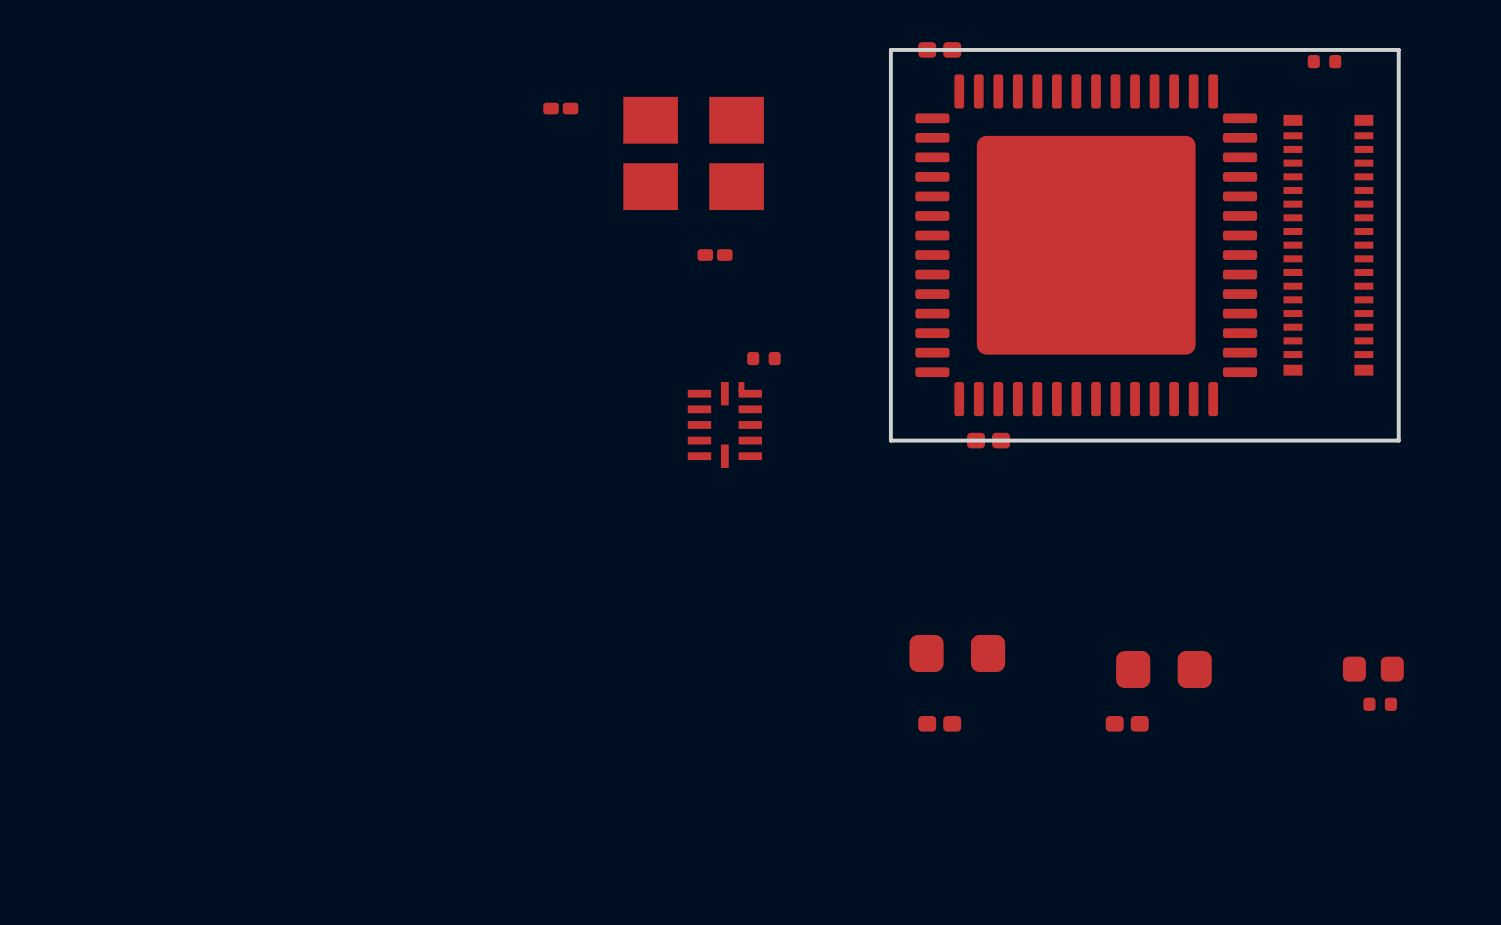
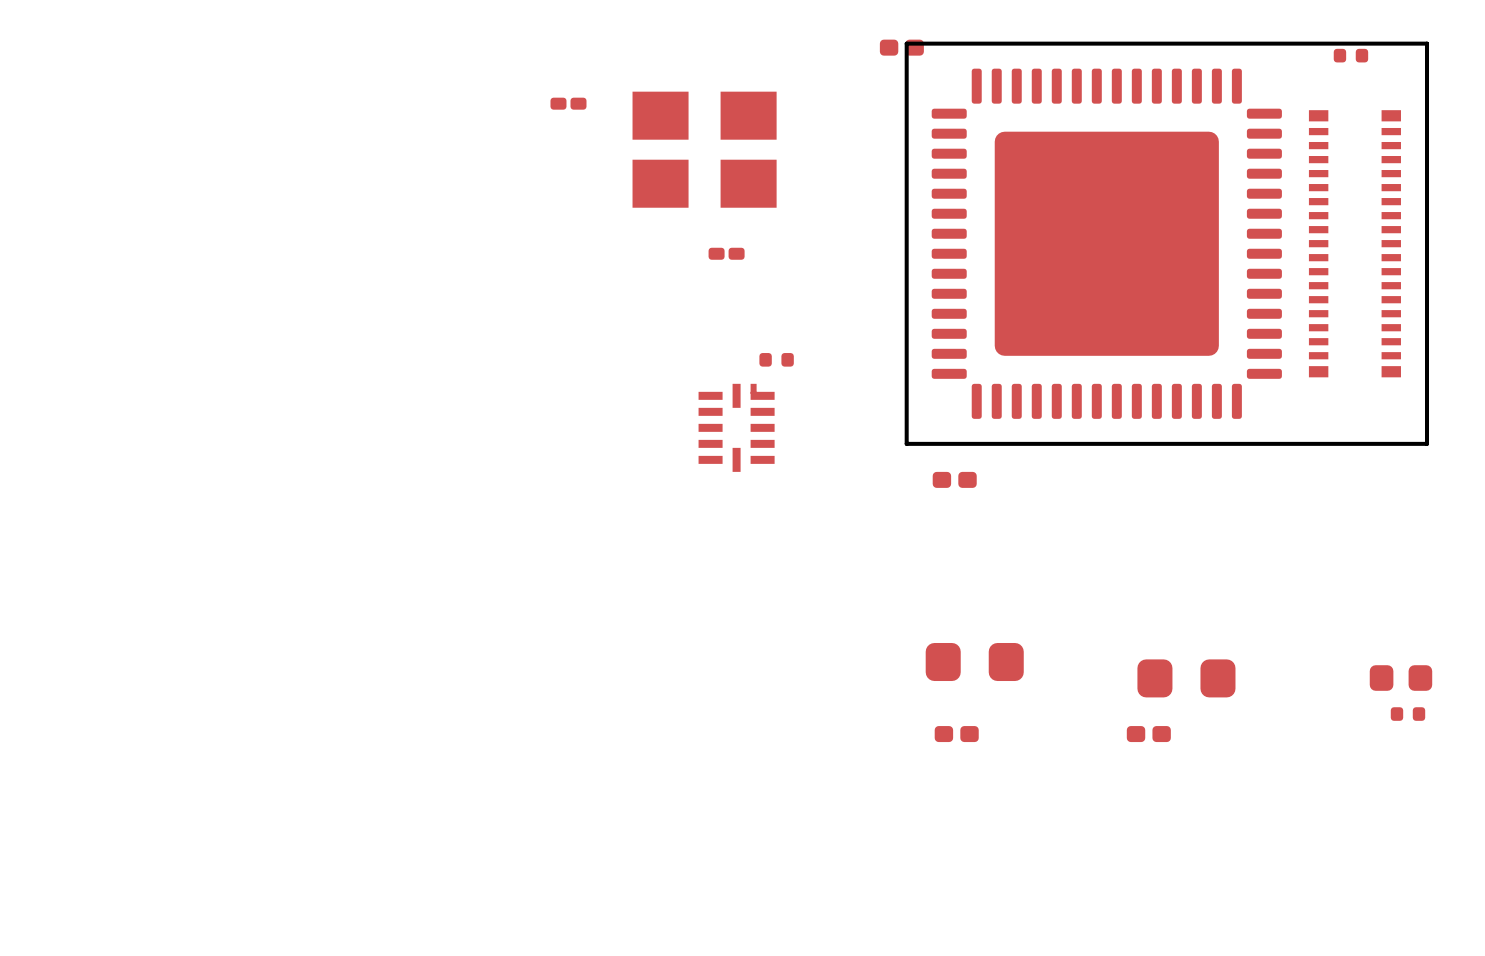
part position: (939, 49) -> (901, 47)
part position: (988, 440) -> (954, 479)

